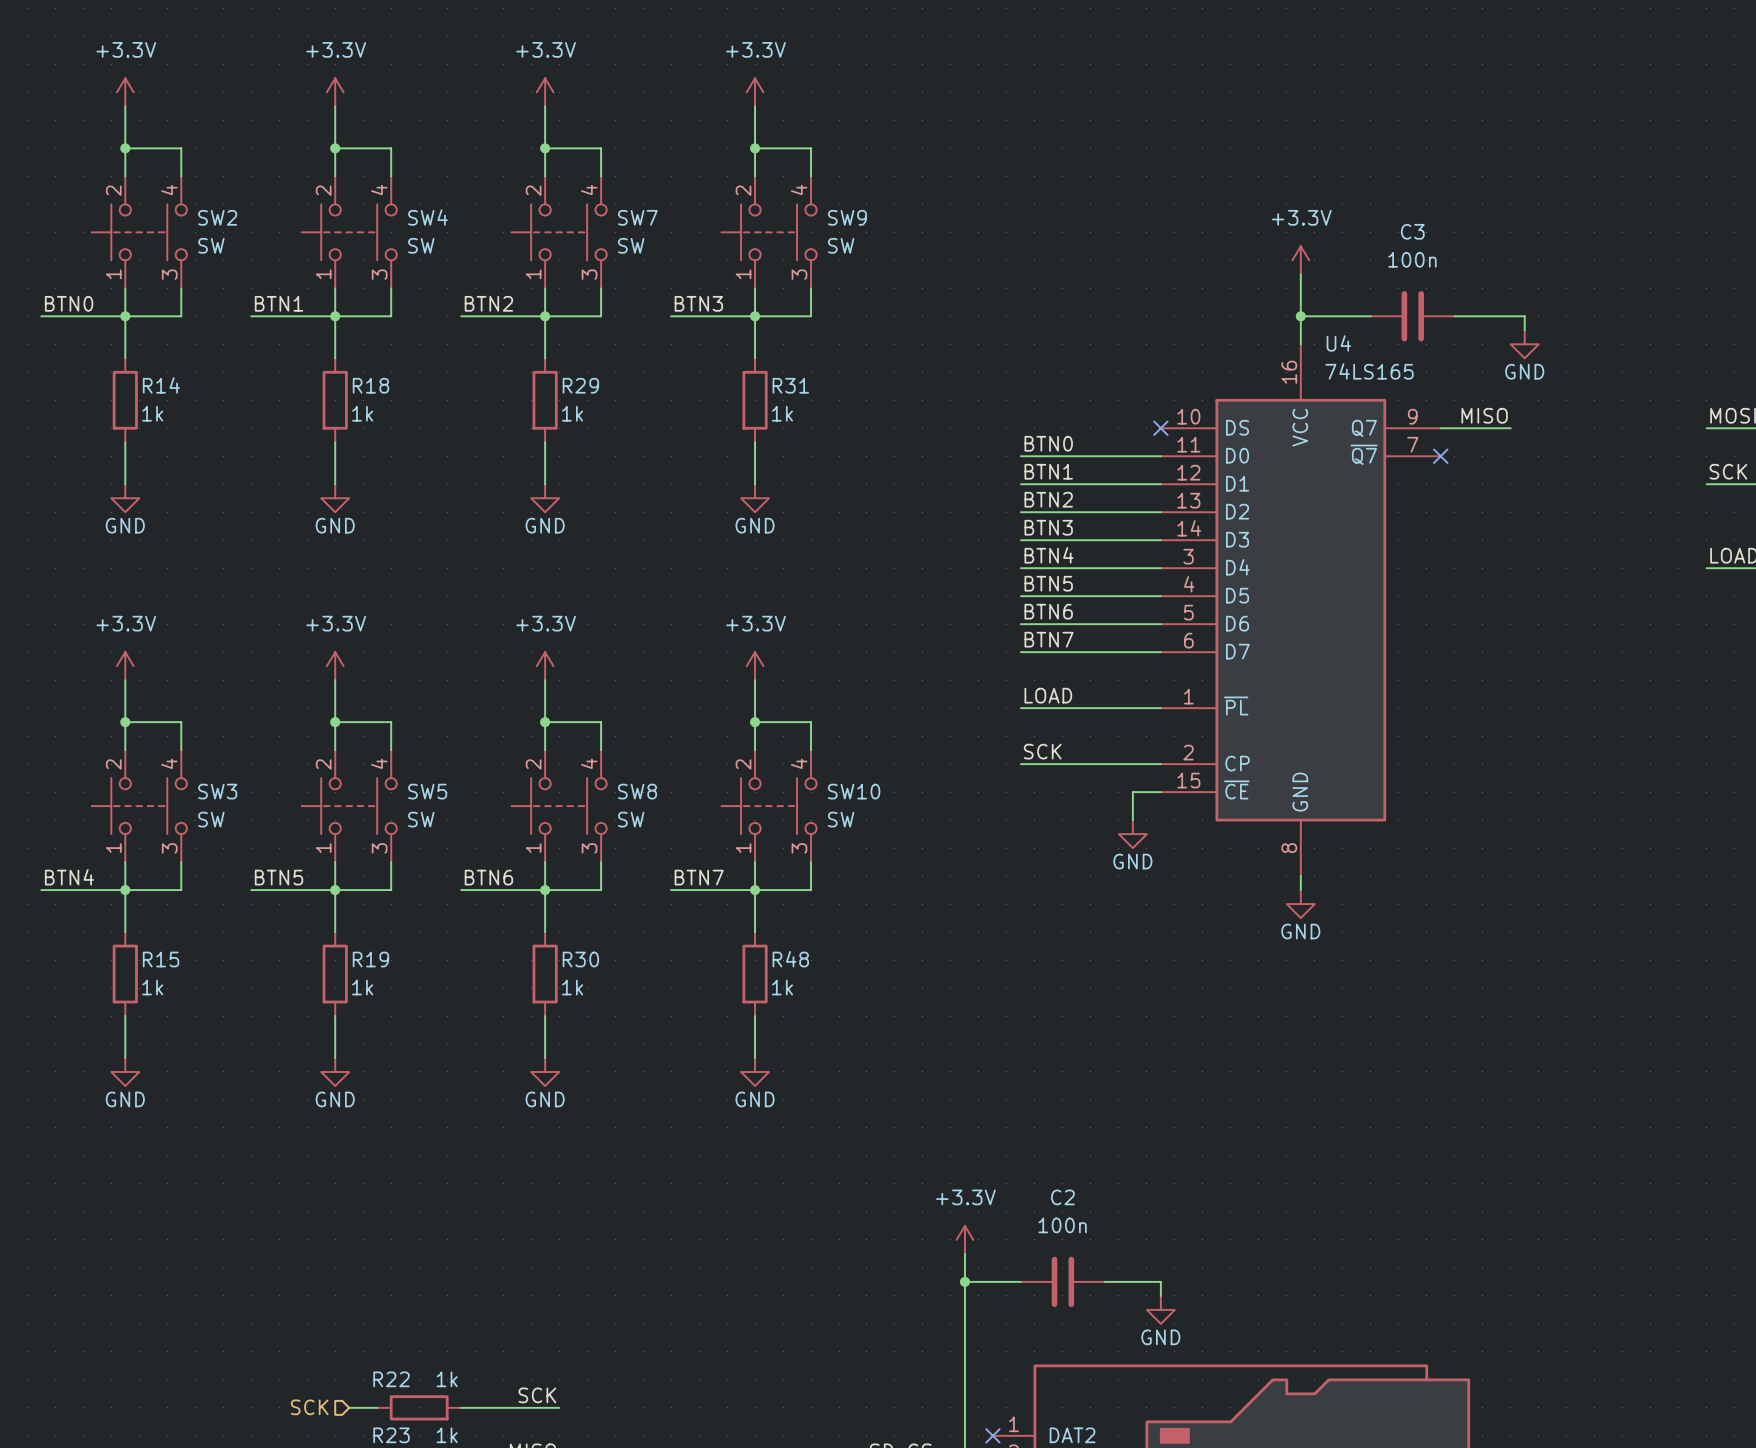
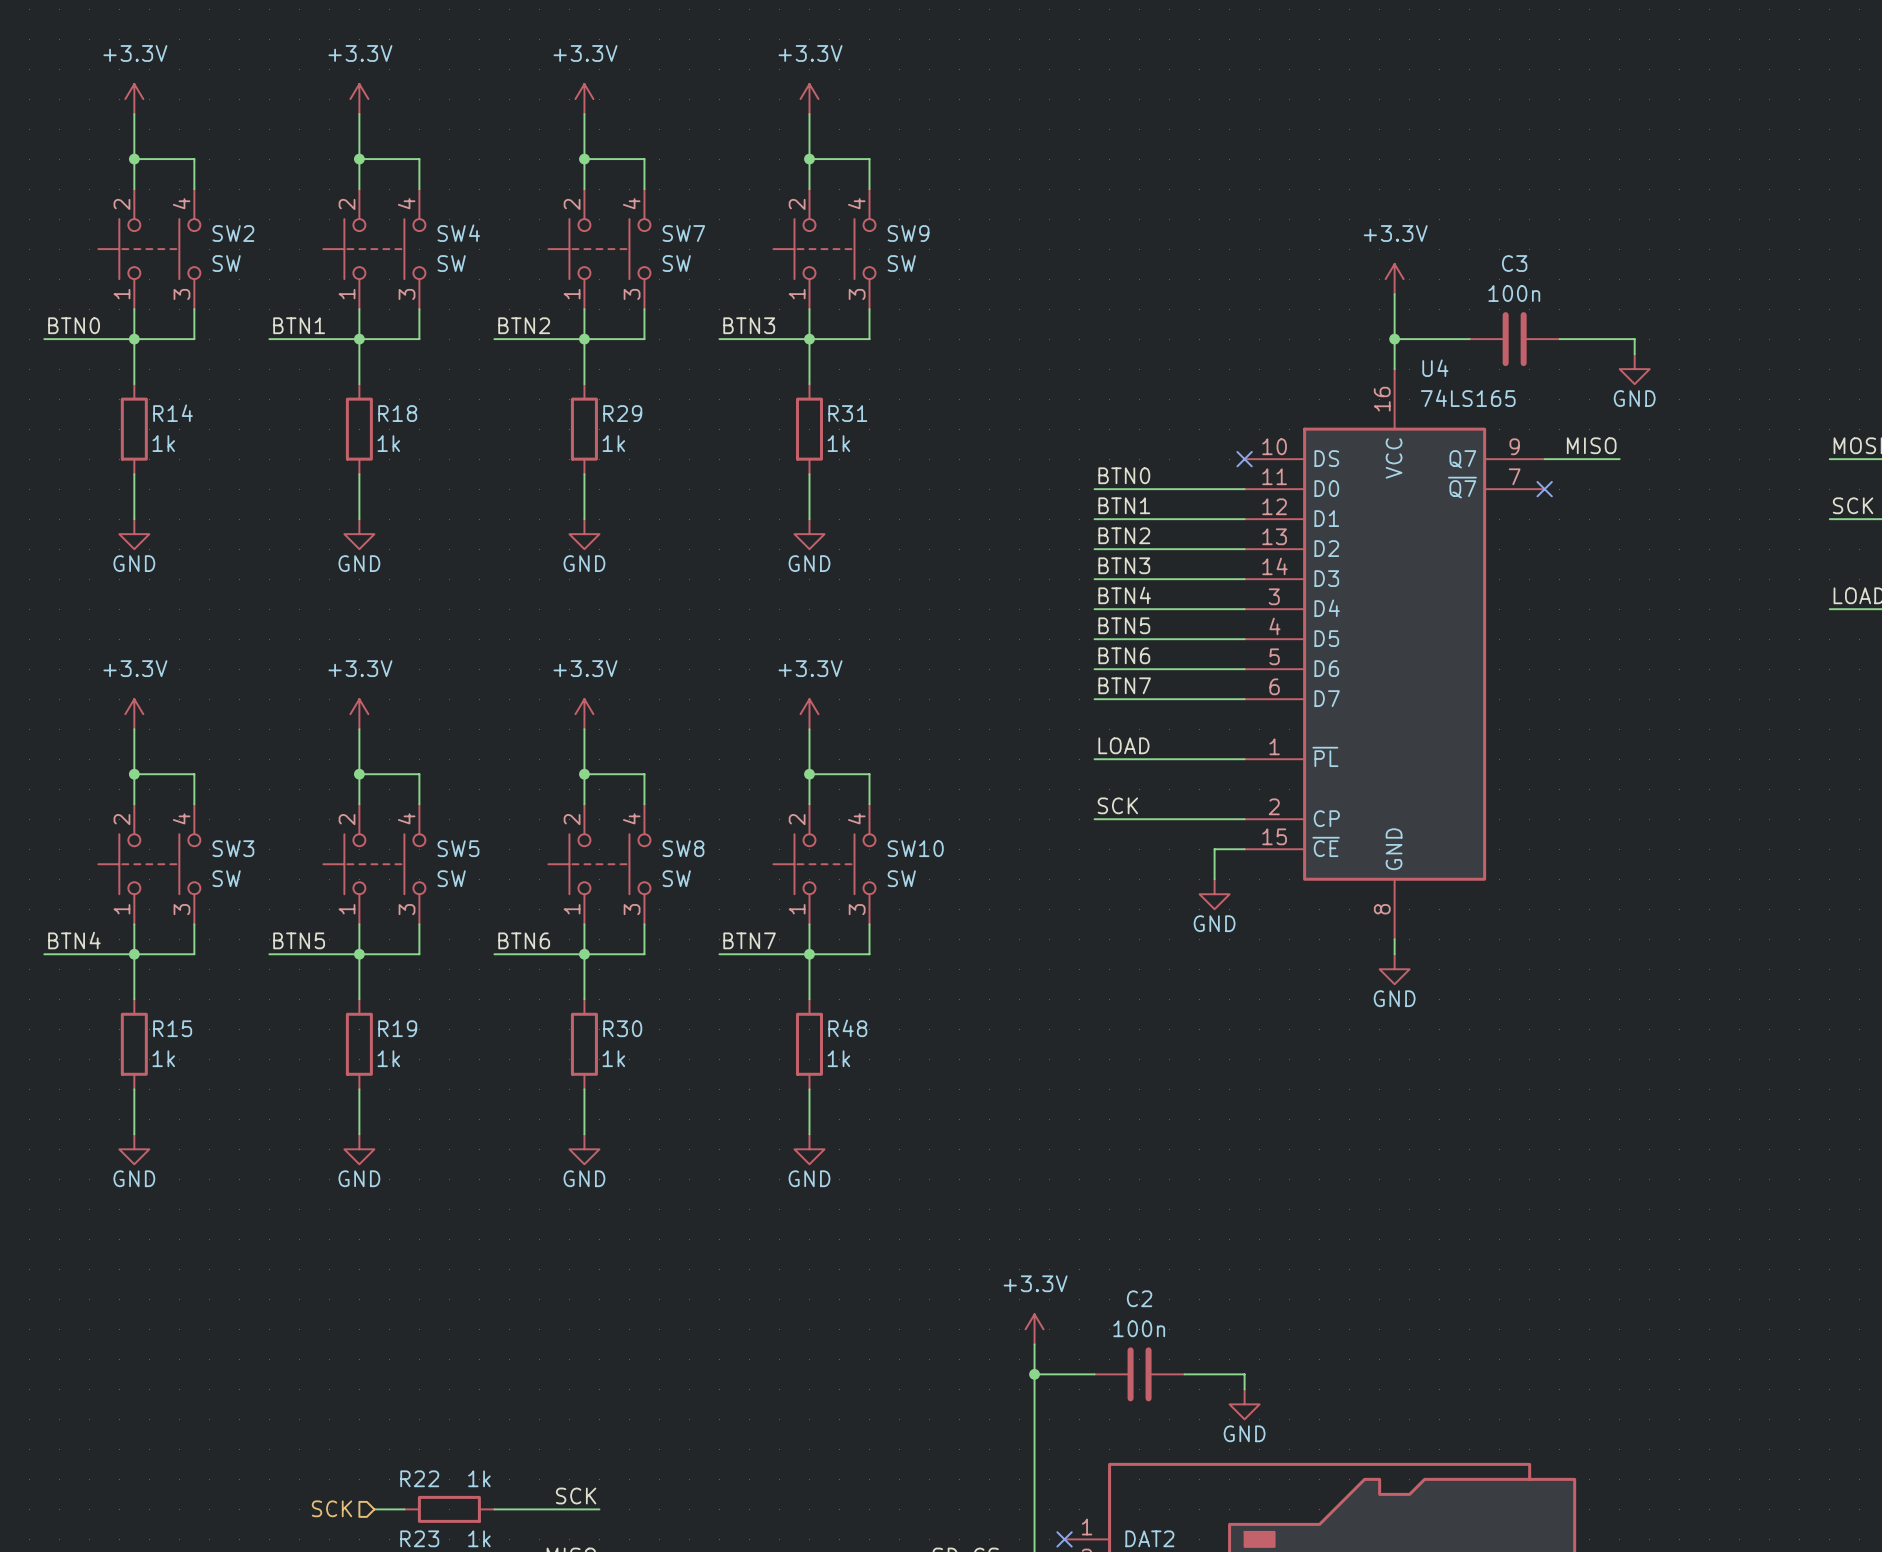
C3 name position: C3 (1412, 231) -> C3 (1514, 263)
C3 value position: 100n (1412, 259) -> 100n (1514, 293)
C2 name position: C2 (1062, 1197) -> C2 (1139, 1298)
C2 value position: 100n (1062, 1225) -> 100n (1139, 1328)

